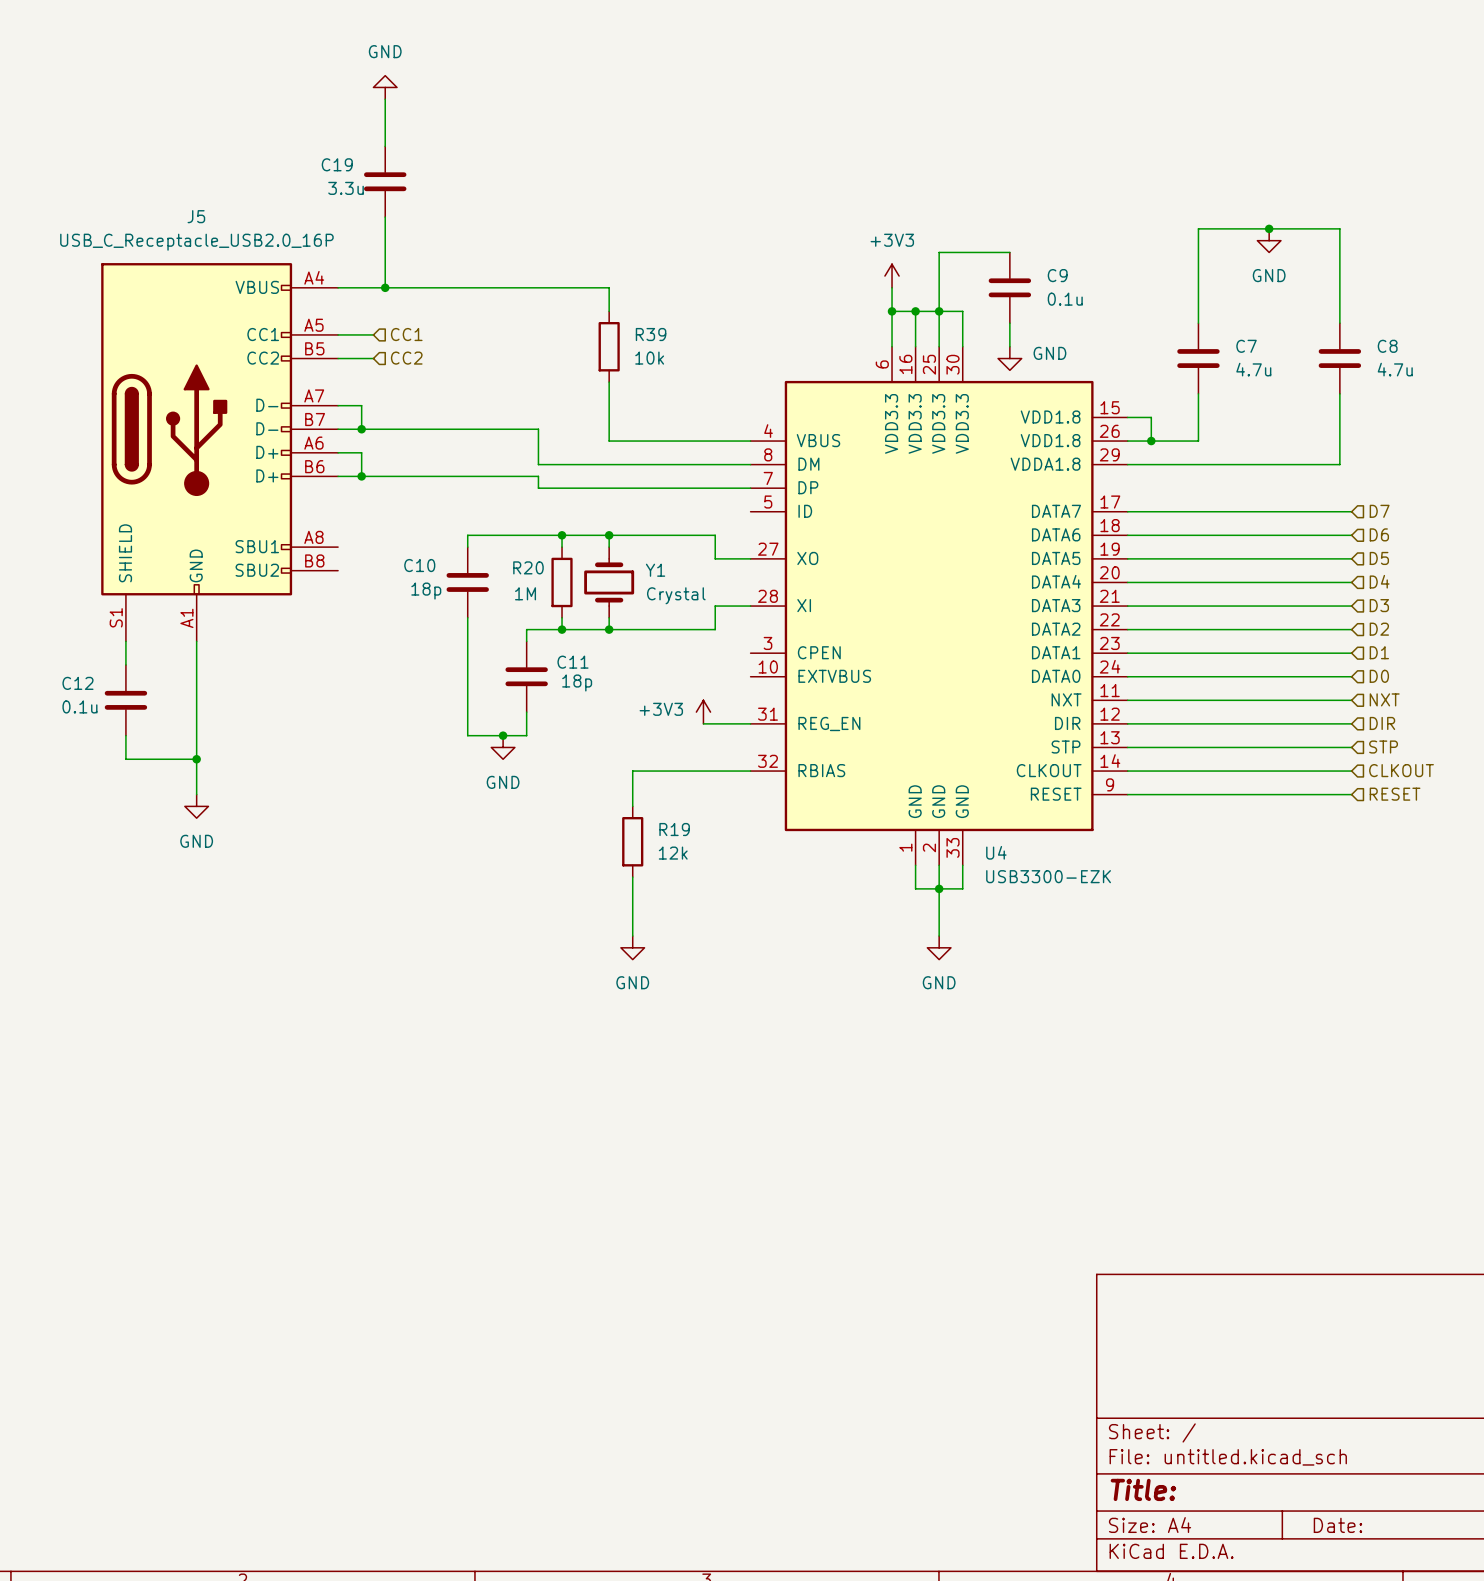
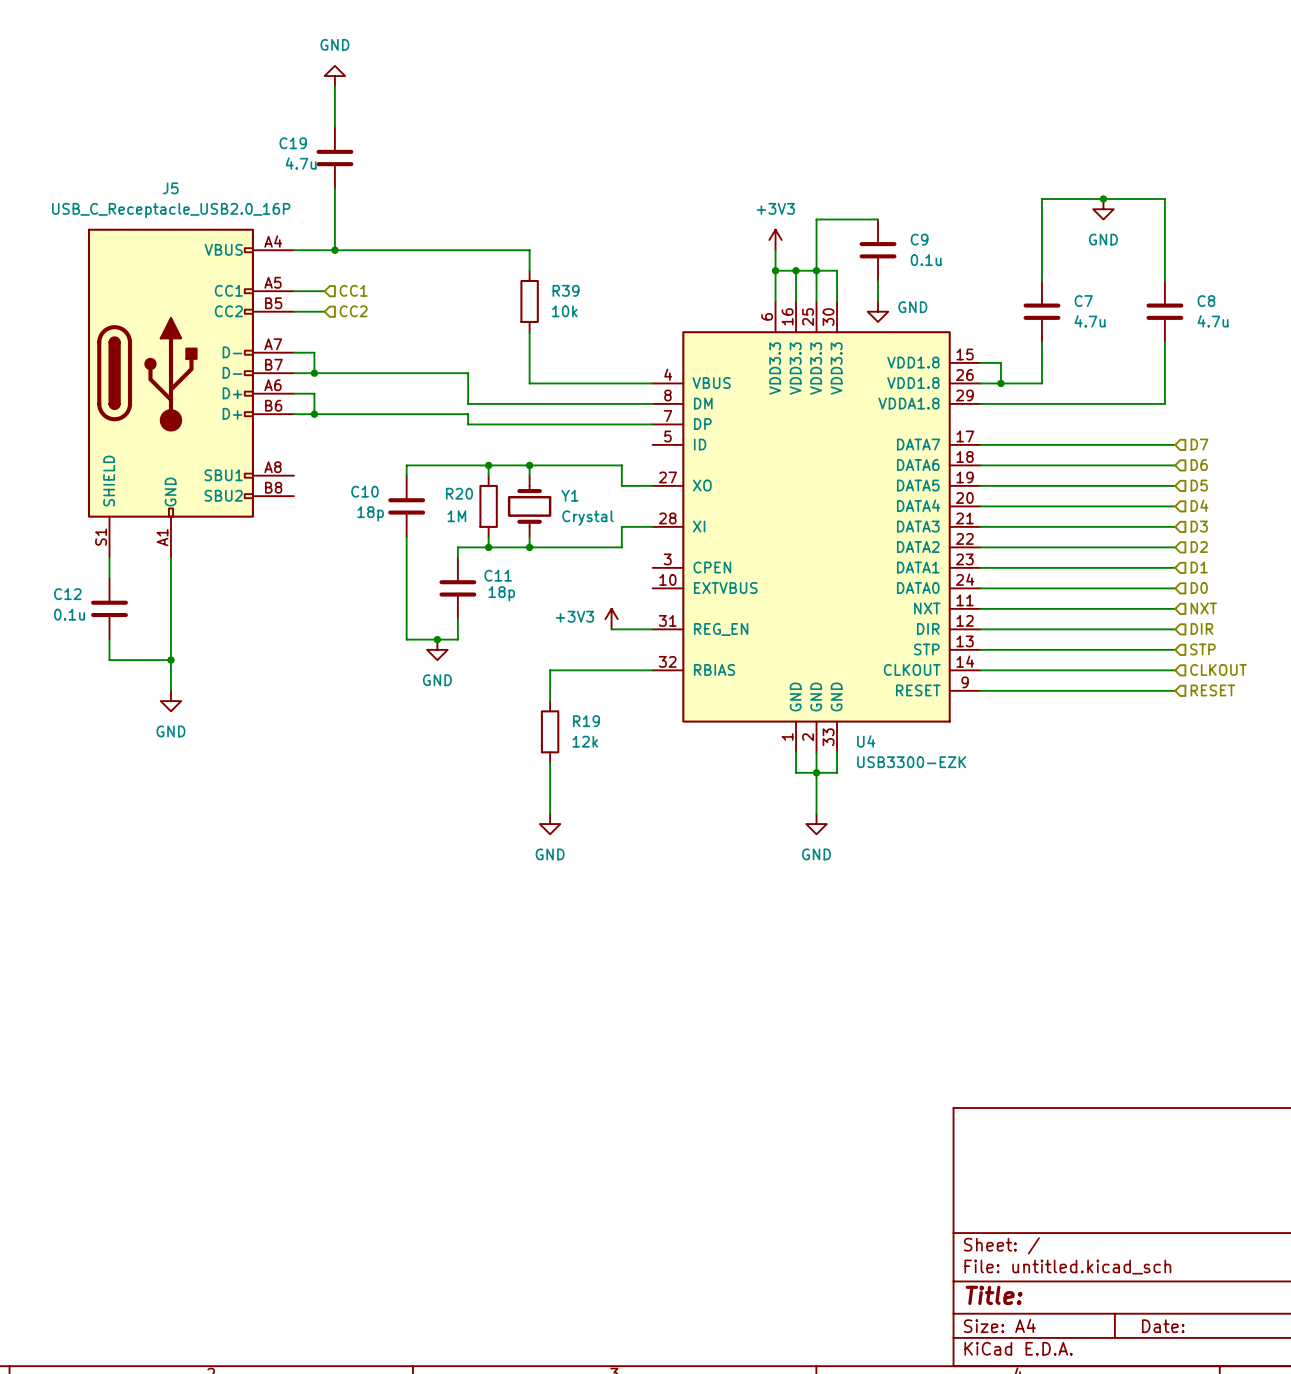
C19 value: 3.3u (346, 188) -> 4.7u (301, 163)

